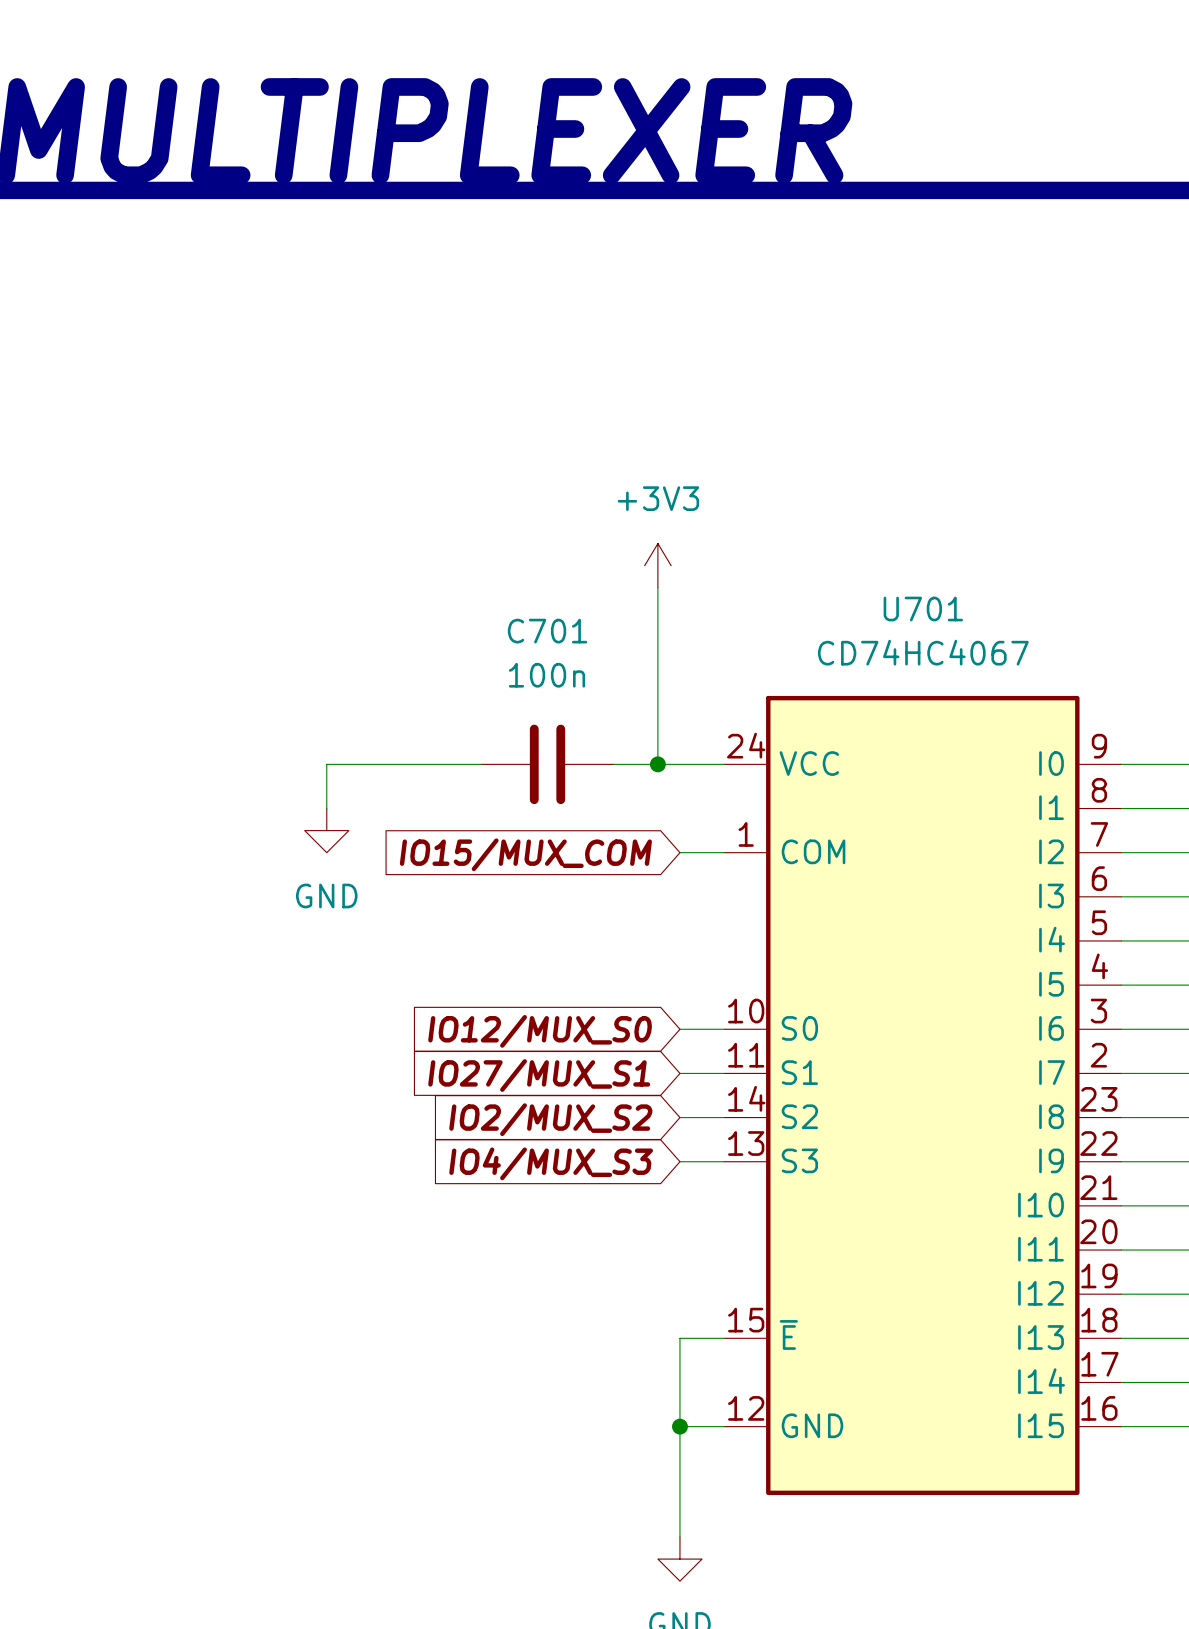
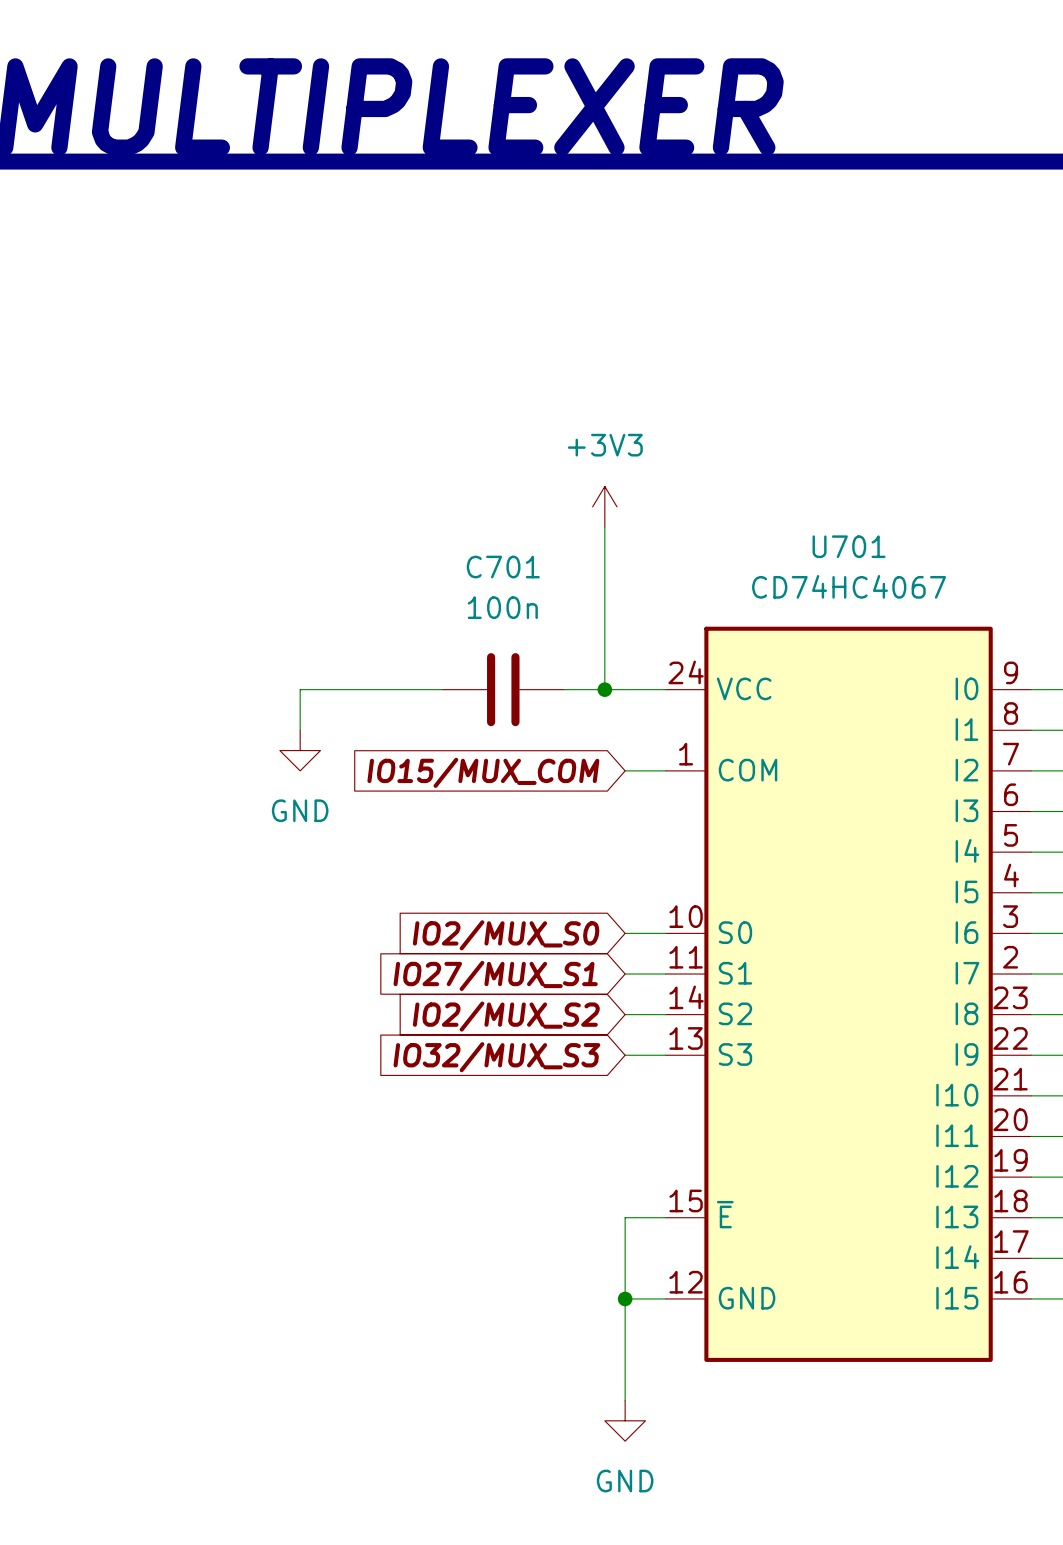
global label: IO12/MUX_S0 (540, 1031) -> IO2/MUX_S0 (506, 935)
global label: IO4/MUX_S3 (551, 1163) -> IO32/MUX_S3 (496, 1057)

